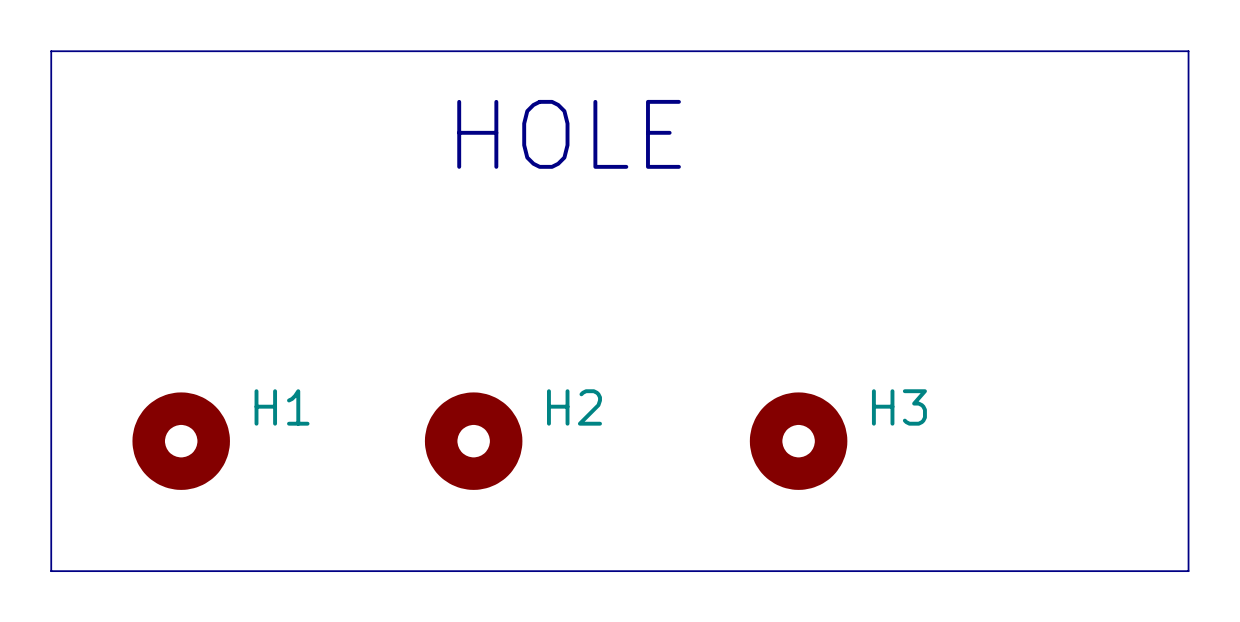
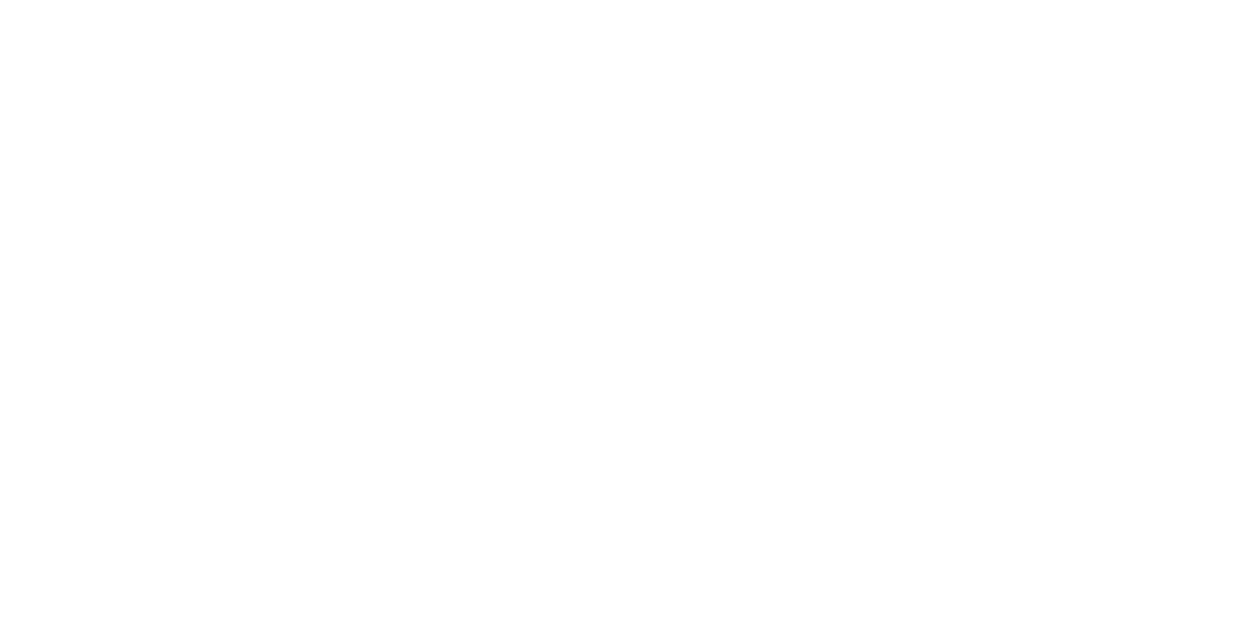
line: (51, 51) (1188, 51) (1188, 571) (51, 571) (51, 51) -> none
text: HOLE (569, 134) -> none
H1: (181, 441) -> none
H2: (473, 441) -> none
H3: (798, 441) -> none

